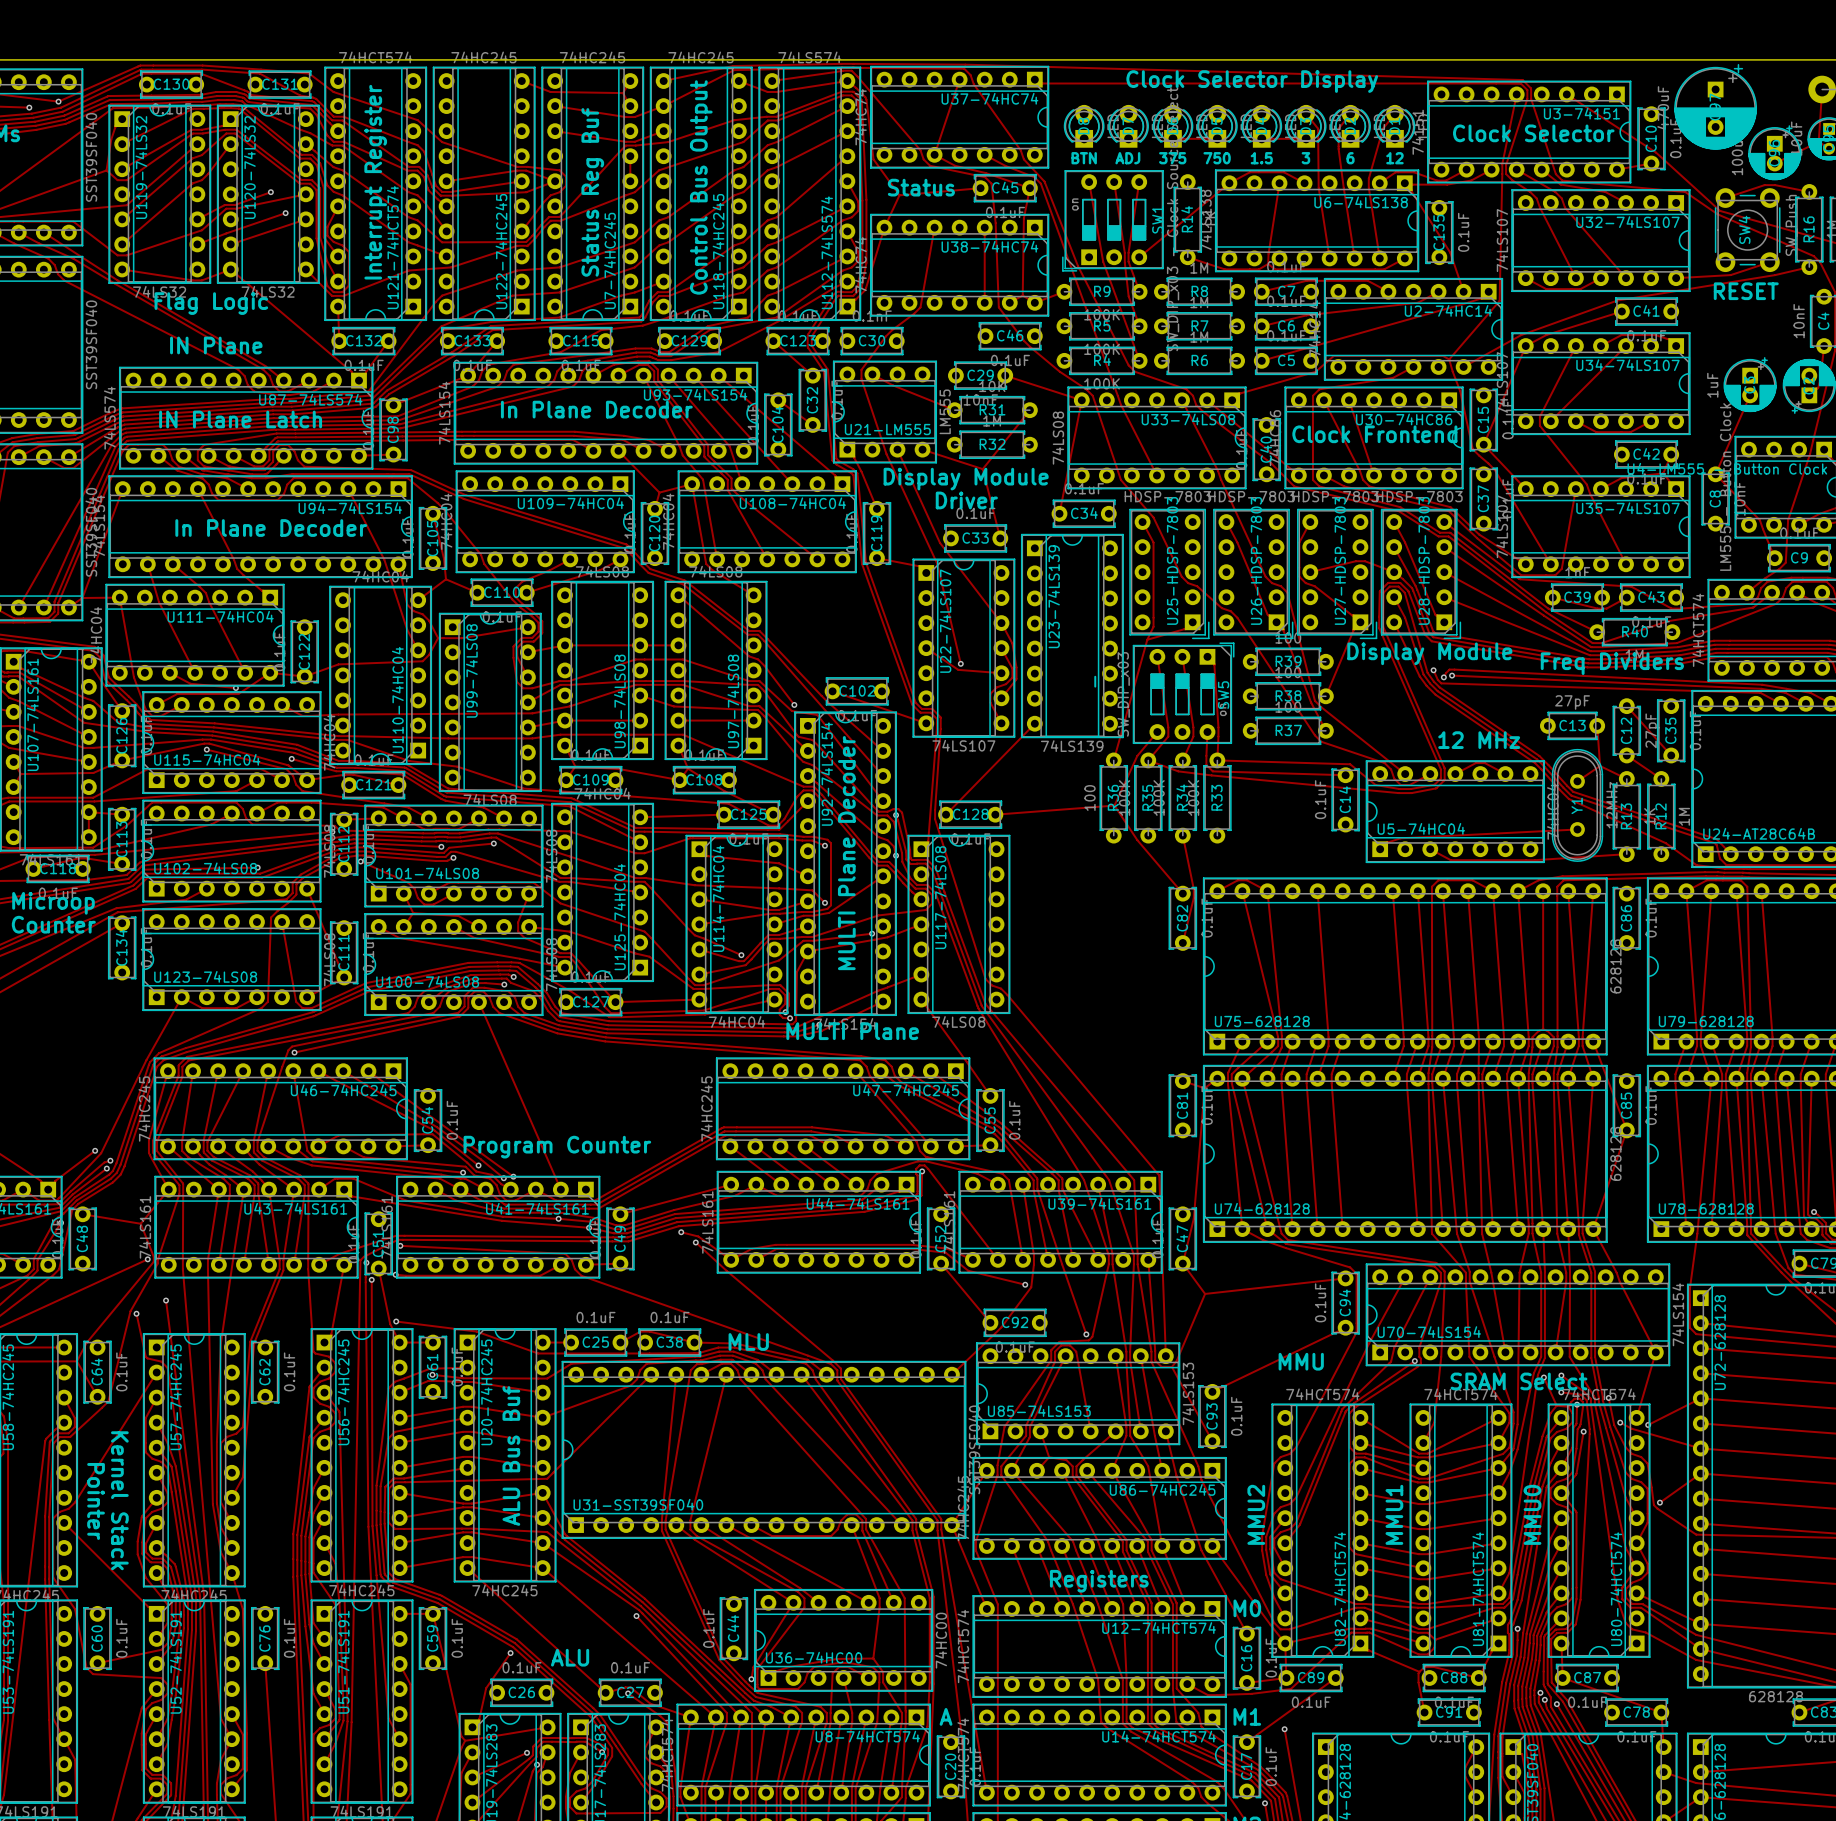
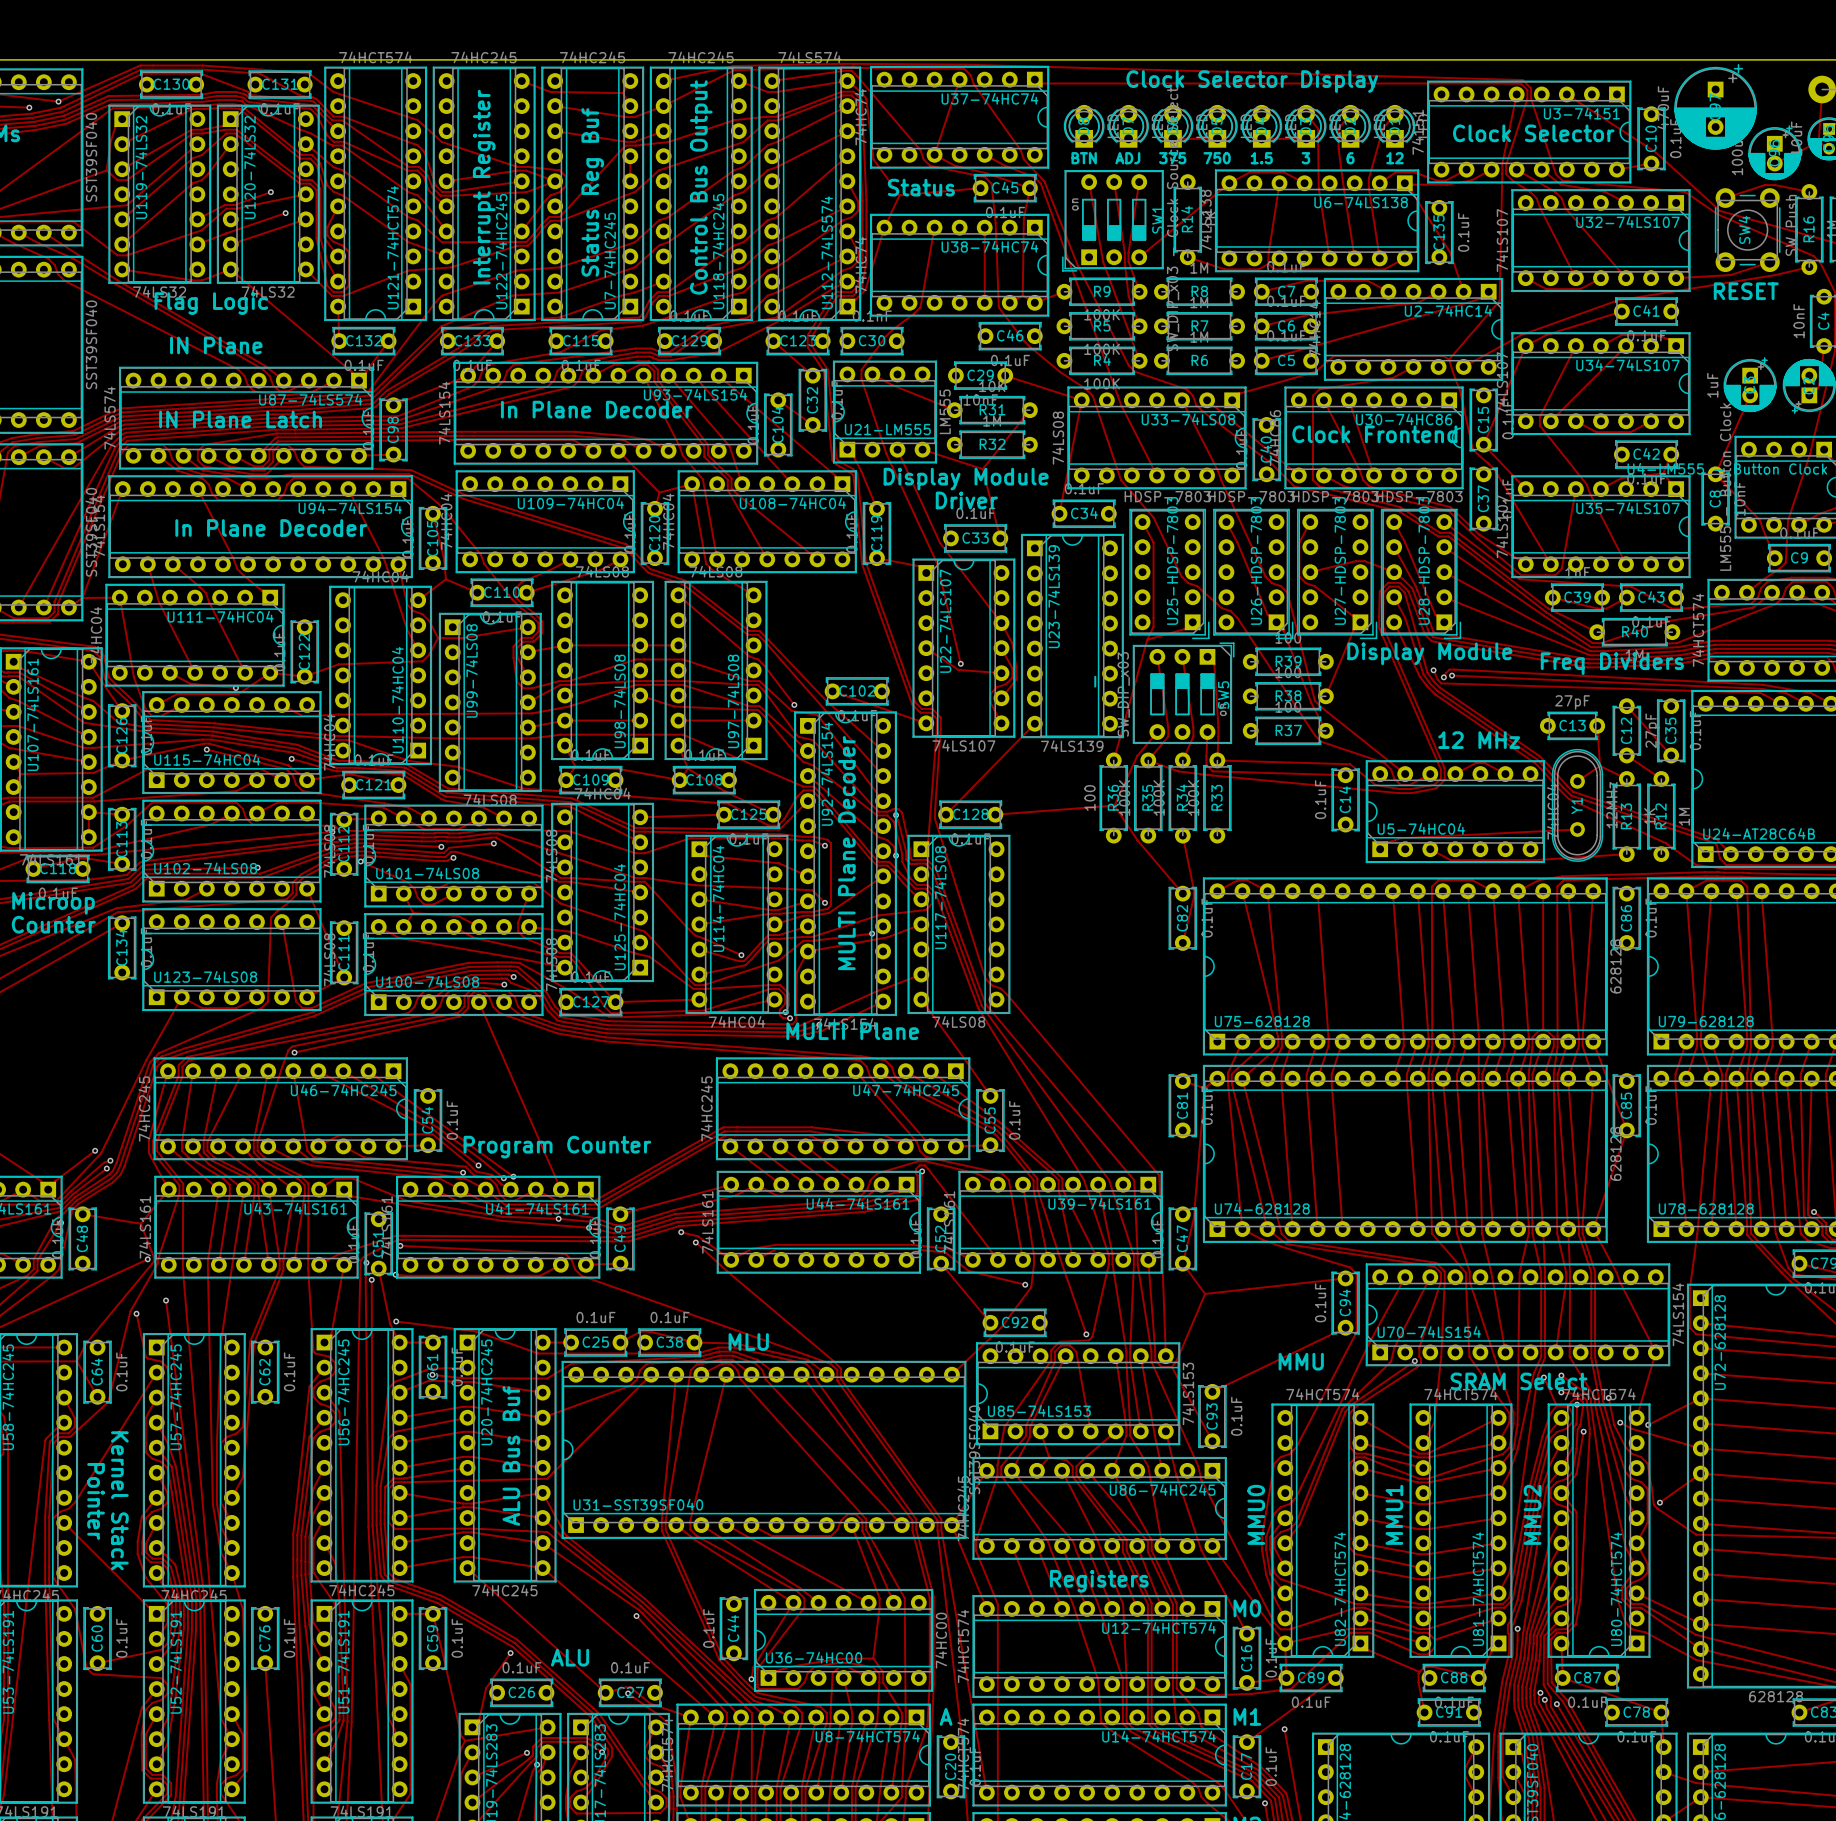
text position: Interrupt Register (375, 182) -> Interrupt Register (484, 187)
text: MMU2 (1256, 1514) -> MMU0 (1256, 1514)
text: MMU0 (1532, 1514) -> MMU2 (1532, 1514)

